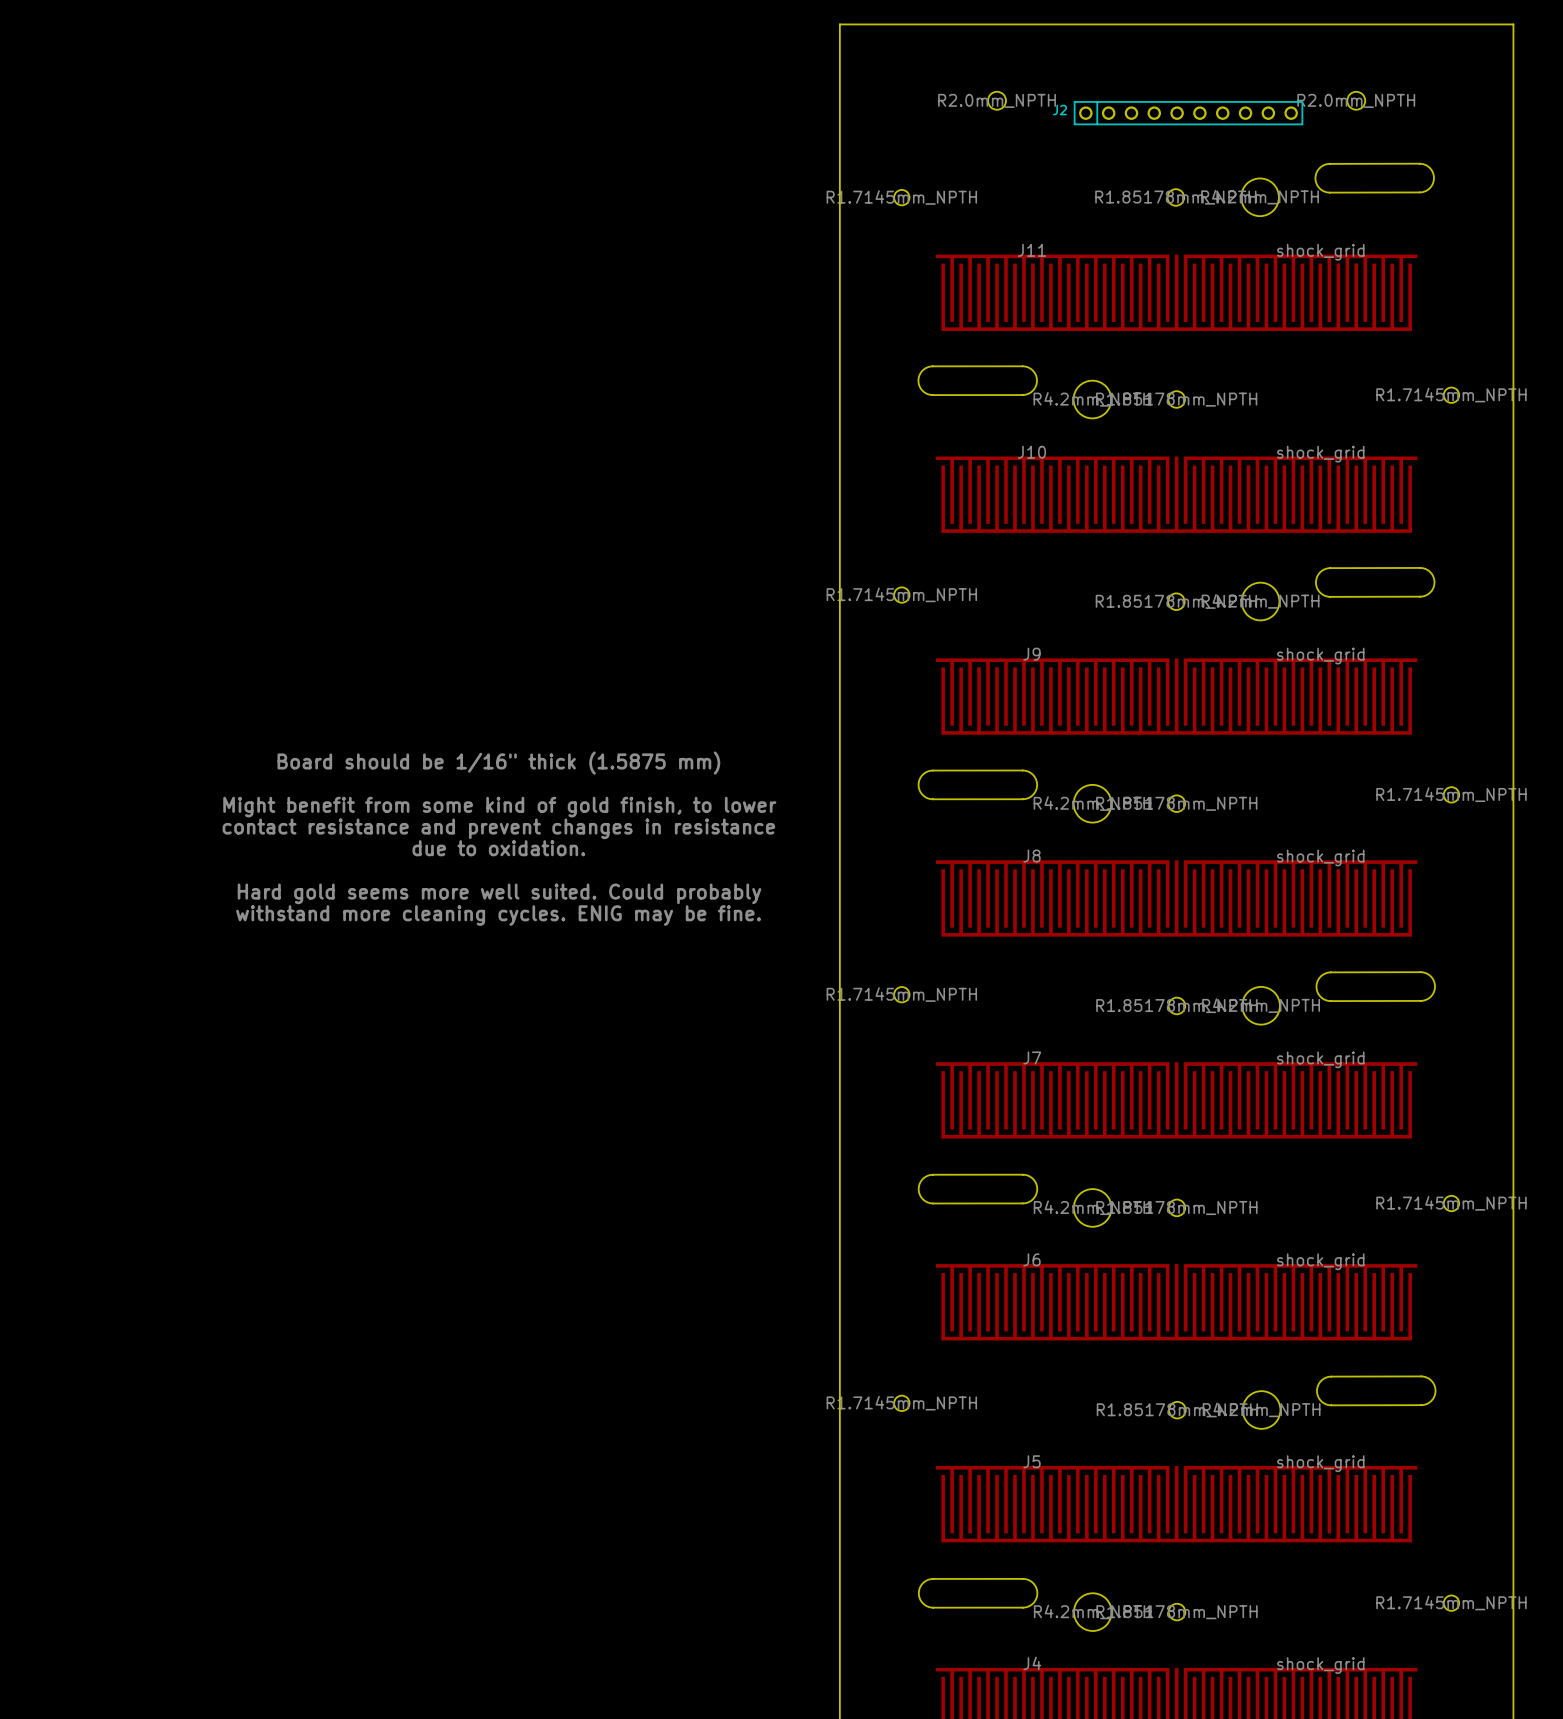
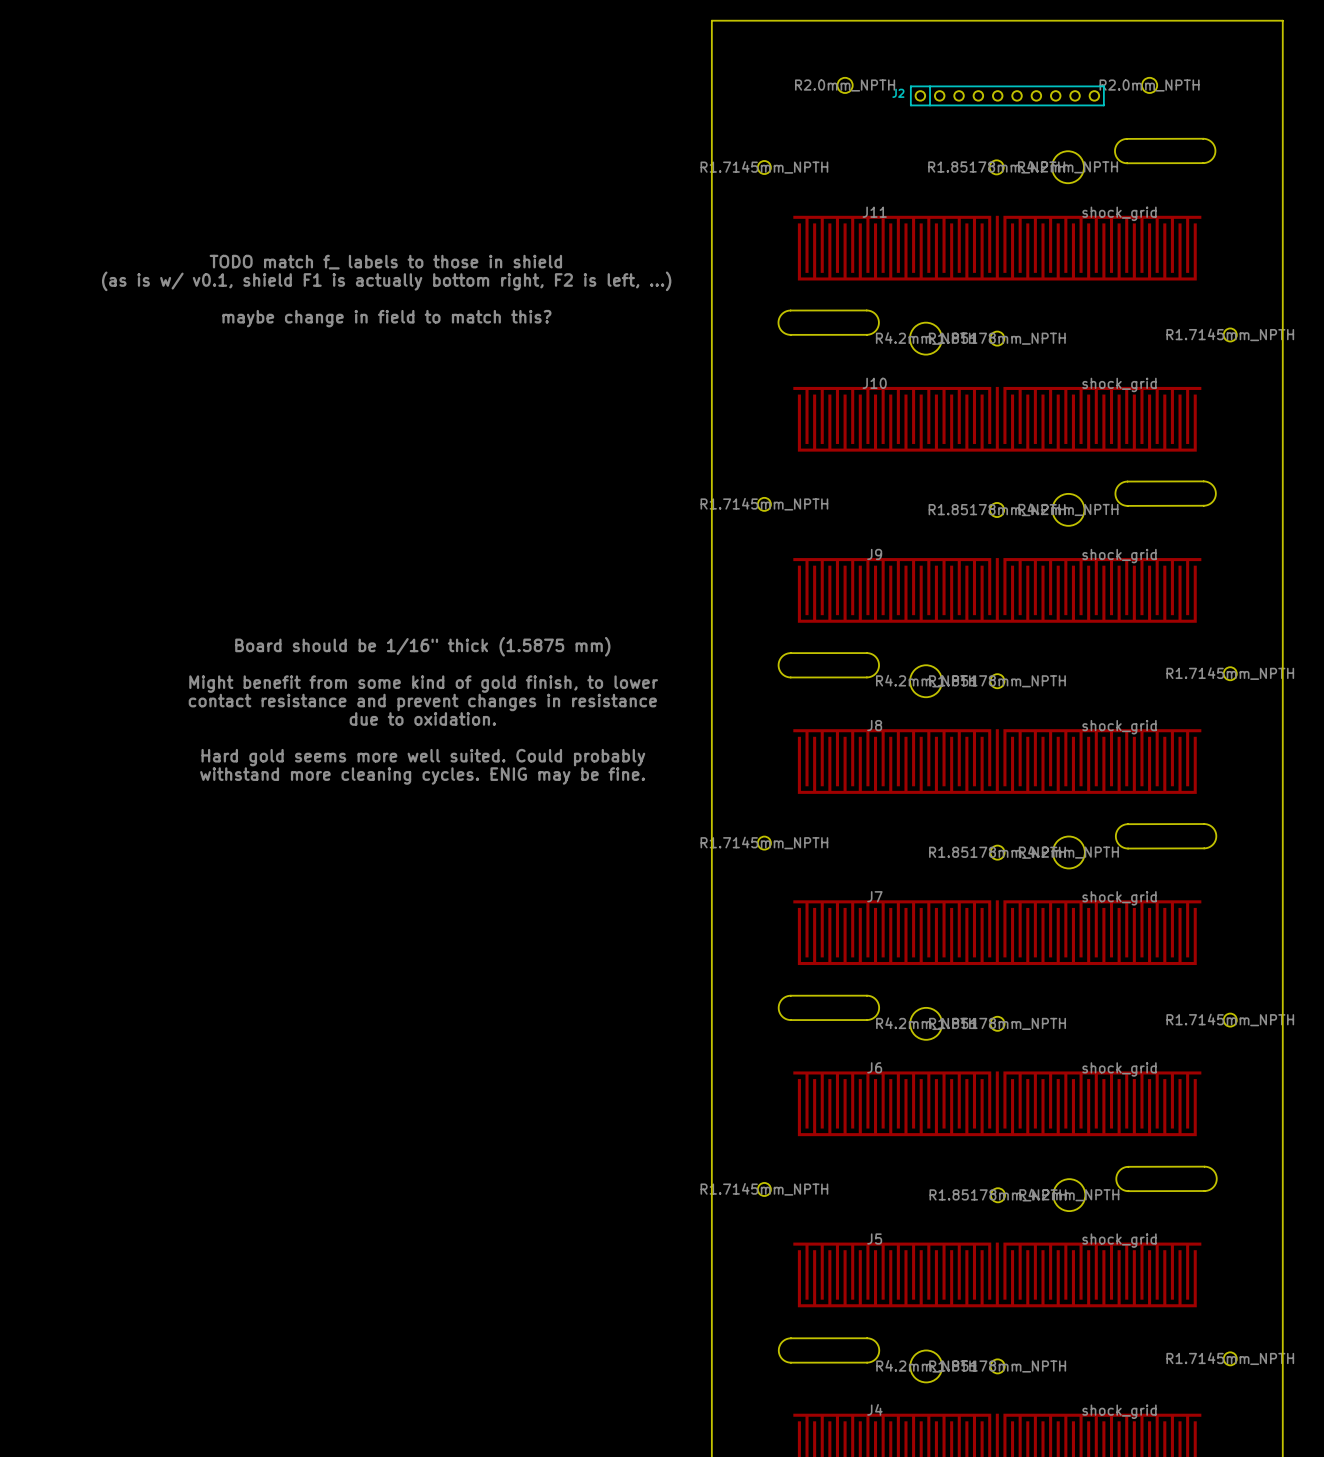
text: none -> TODO match f_ labels to those in shield (385, 262)
text: none -> (as is w/ v0.1, shield F1 is actually bottom right, F2 is left, ...) (386, 281)
text: none -> maybe change in field to match this? (386, 318)

